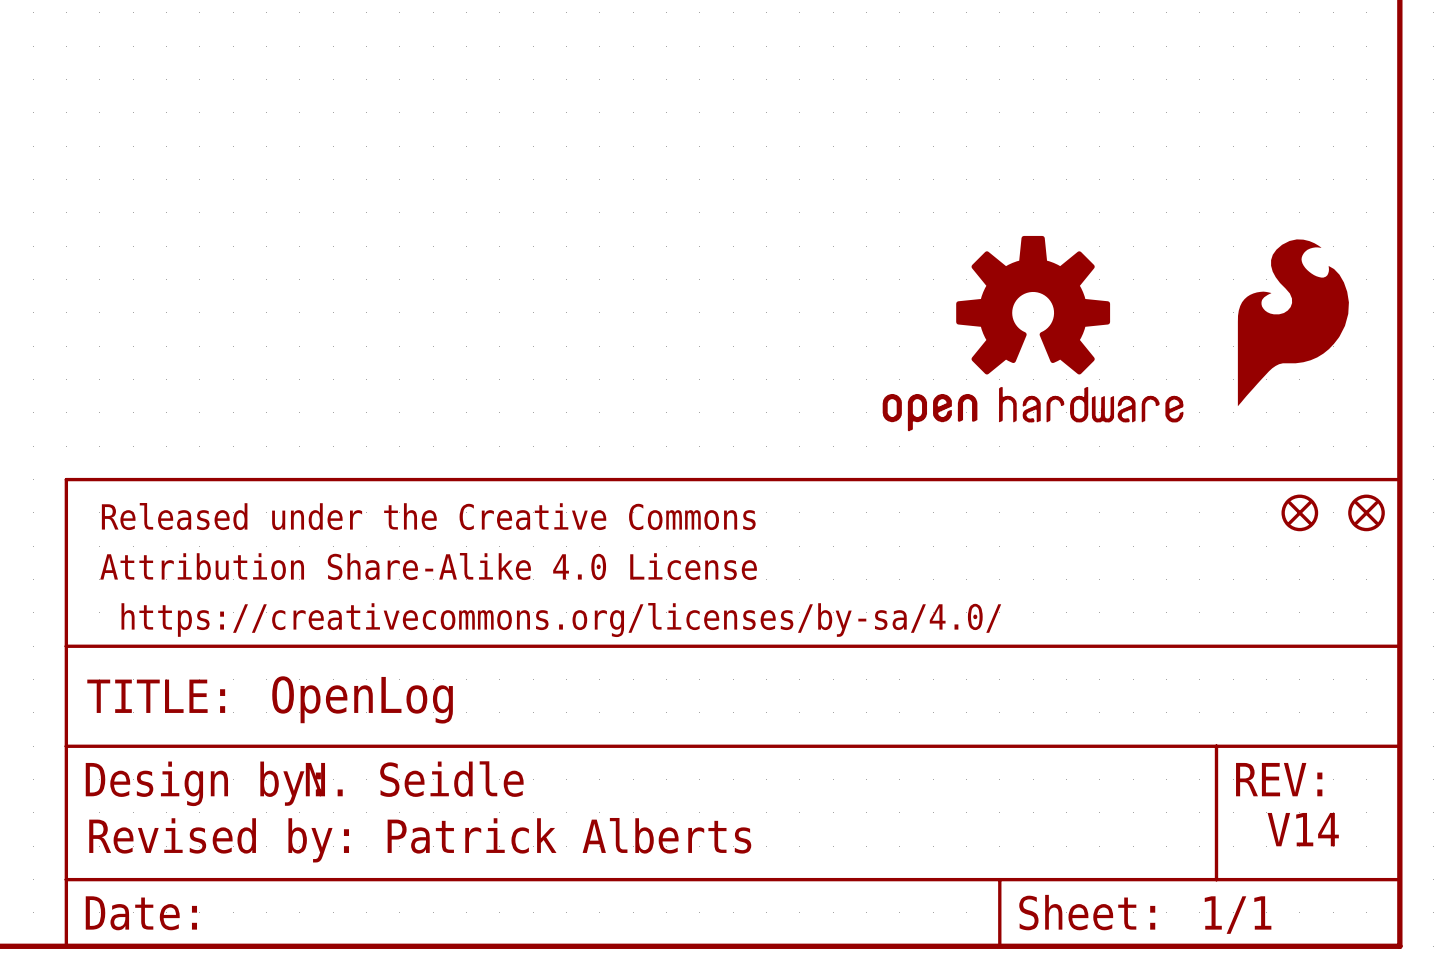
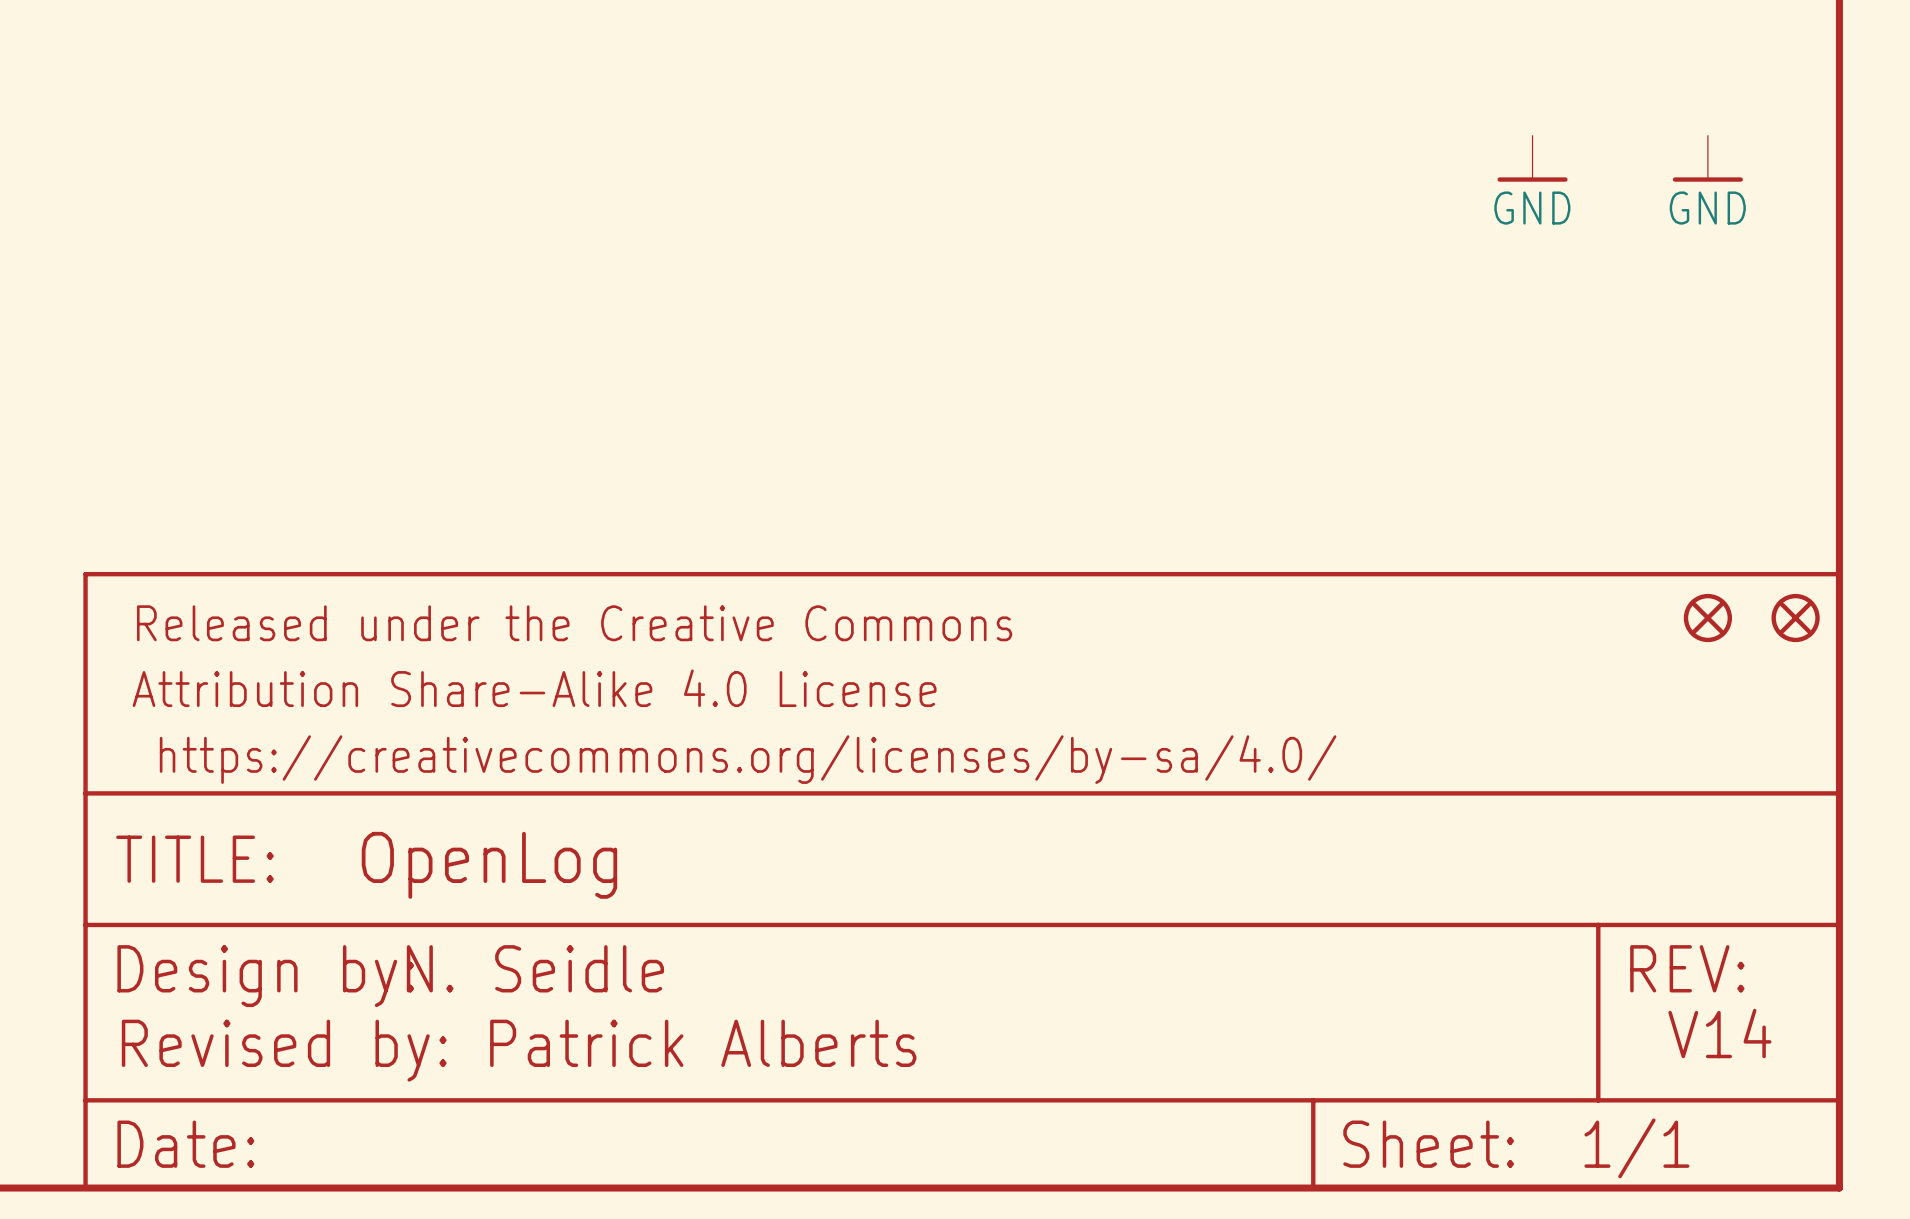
power symbol: none -> GND (1532, 158)
power symbol: none -> GND (1707, 158)
part: (1293, 322) -> none
part: (1033, 333) -> none

